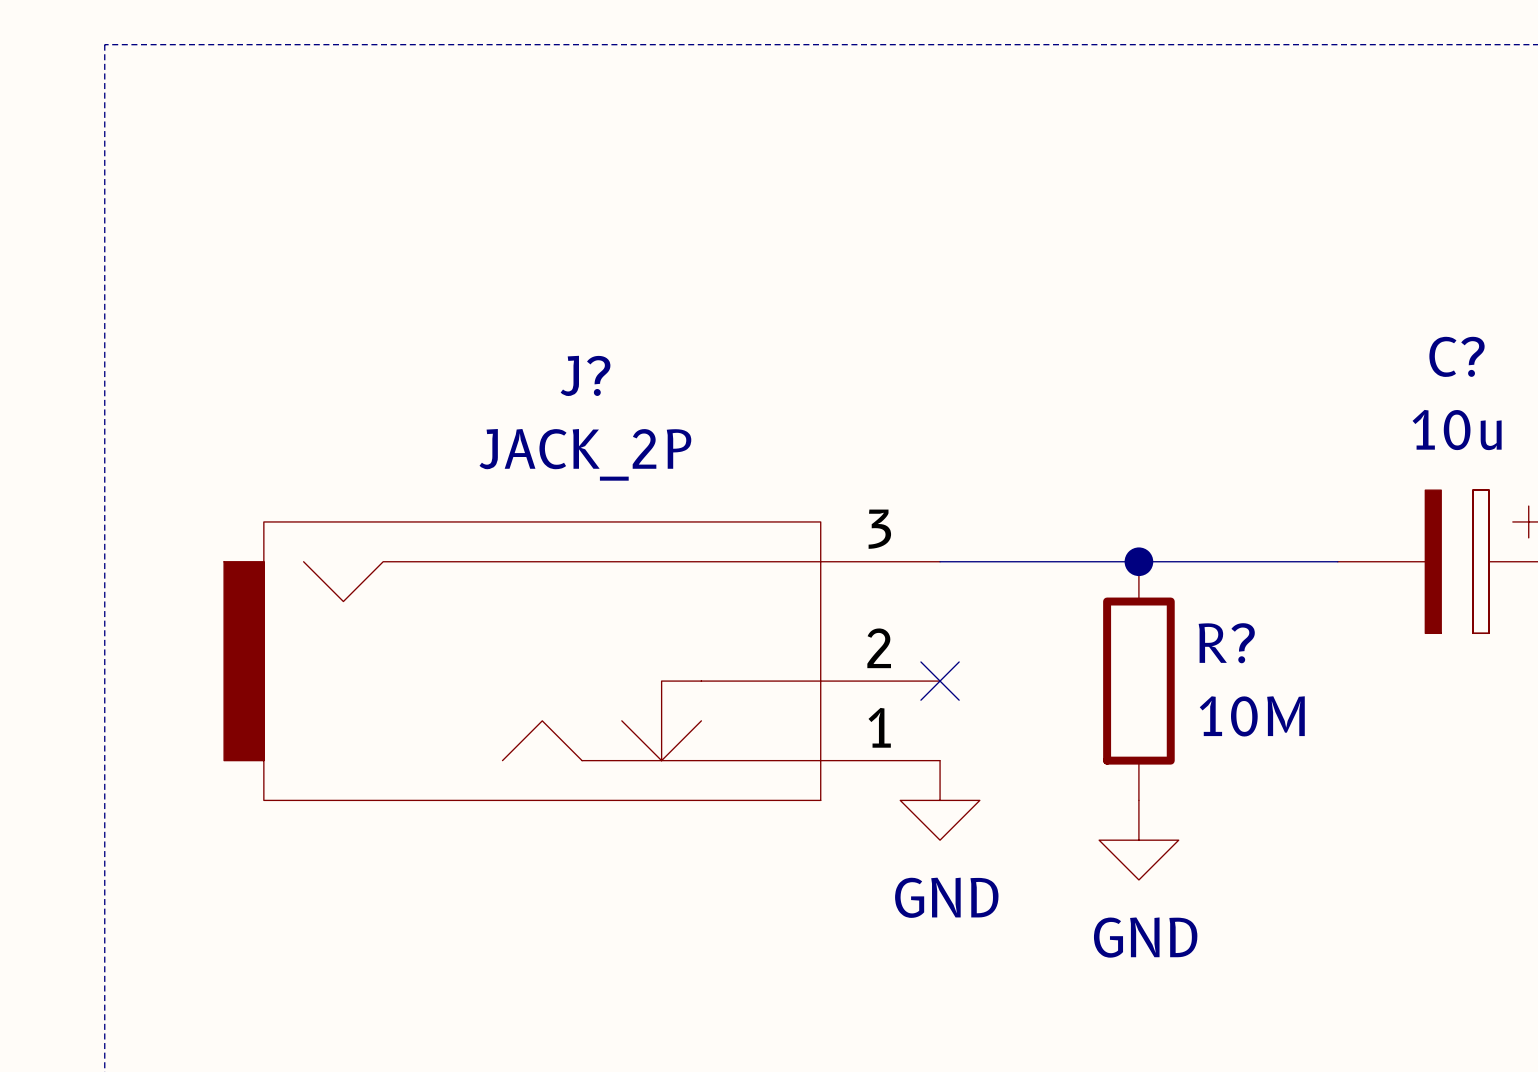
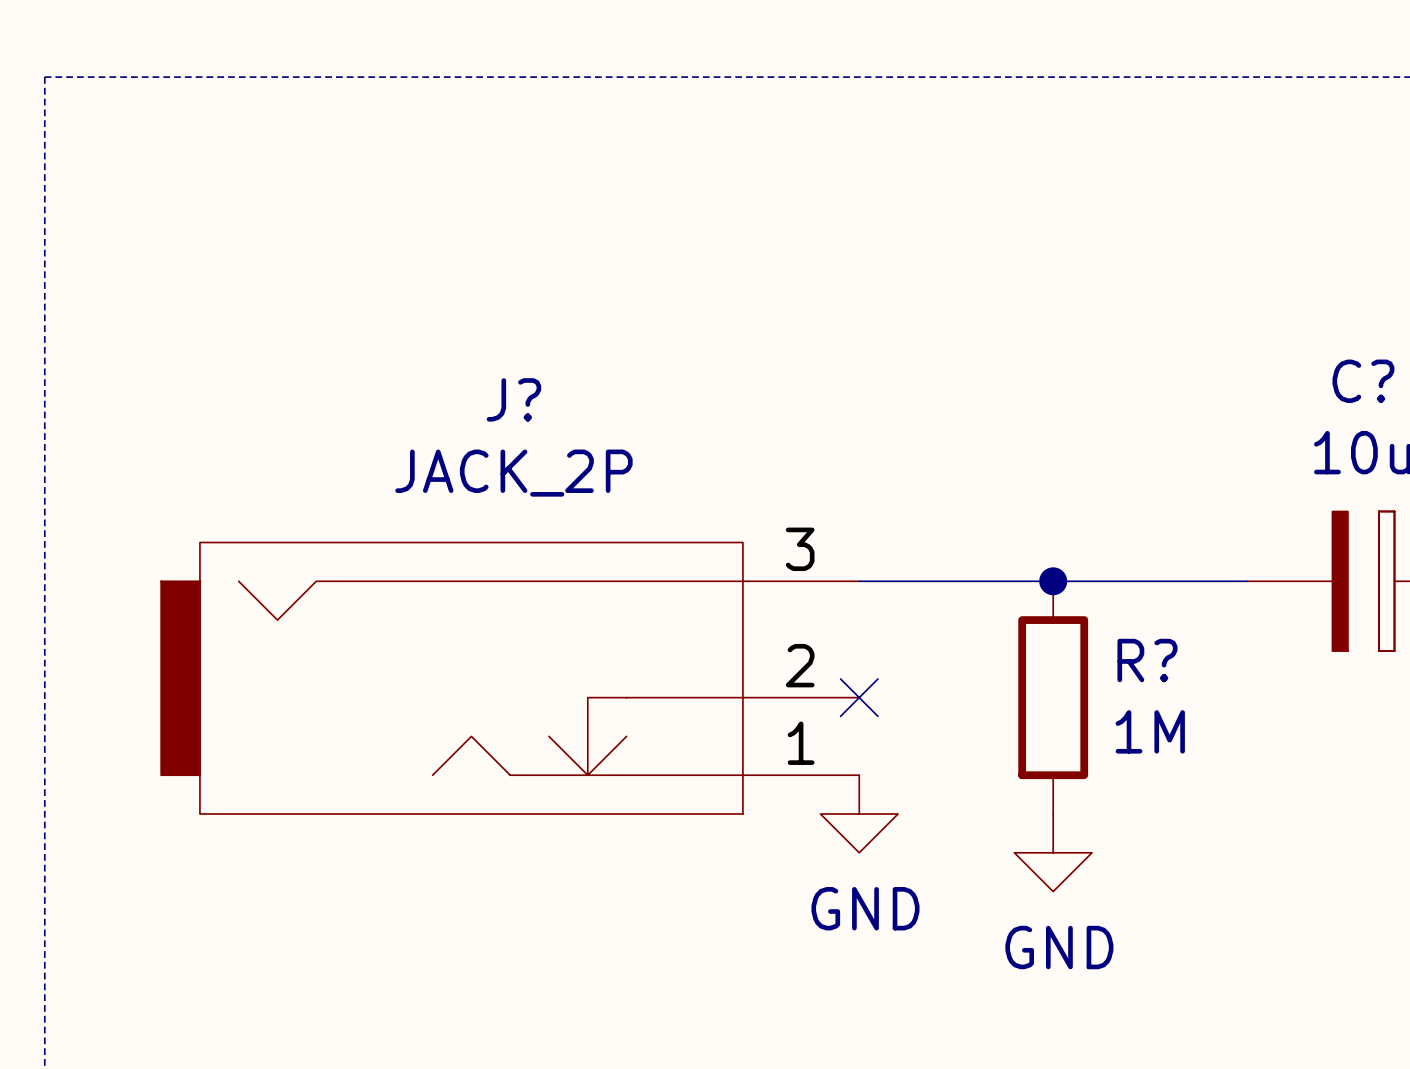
R? value: 10M (1252, 716) -> 1M (1150, 731)

